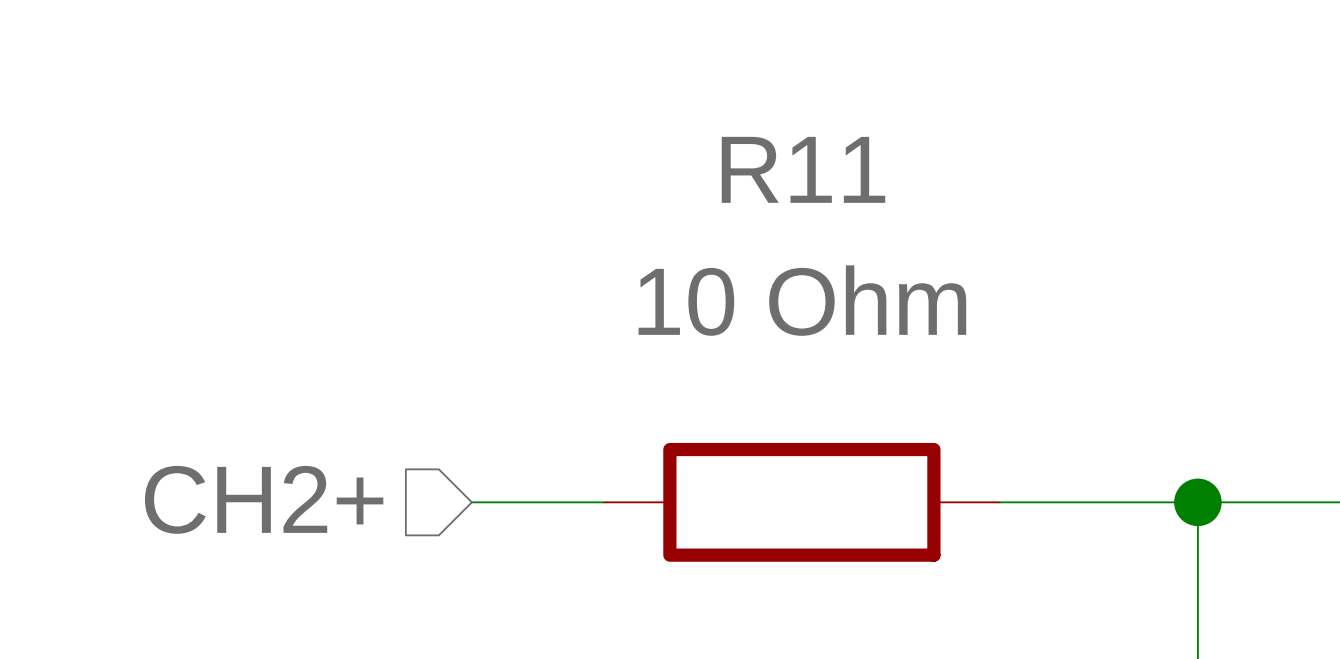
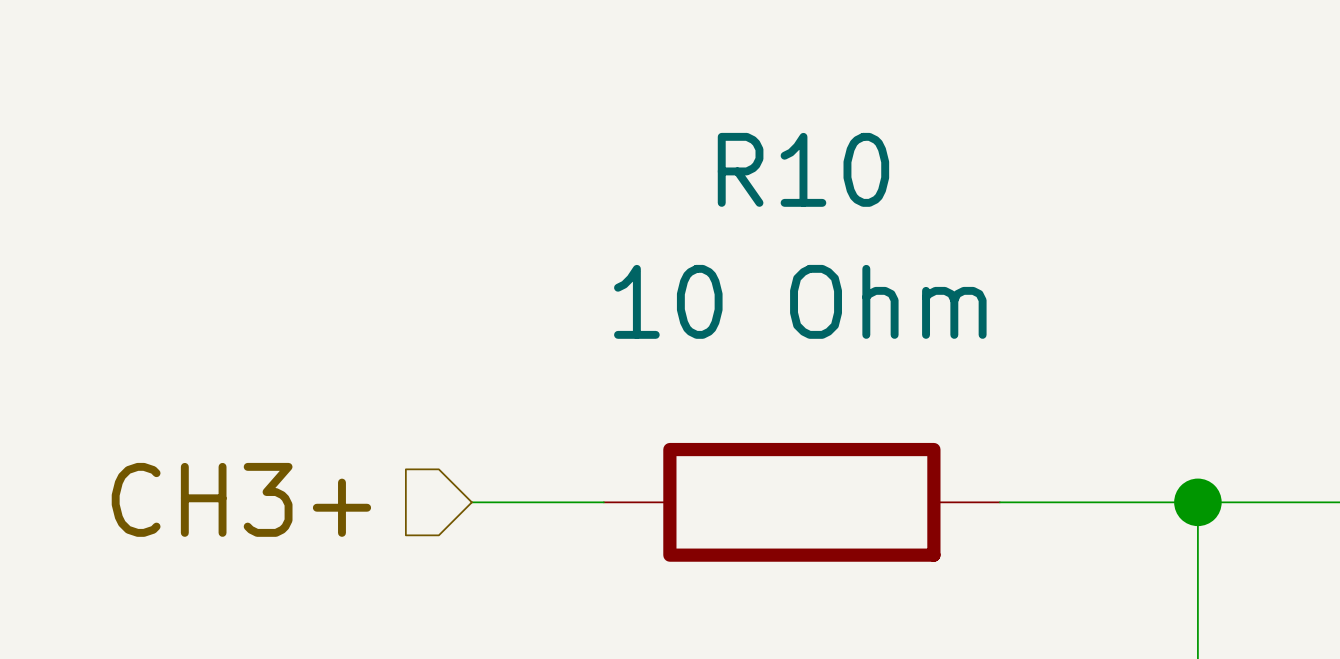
R11 name: R11 (803, 169) -> R10 (803, 169)
hierarchical label: CH2+ (264, 499) -> CH3+ (241, 499)

